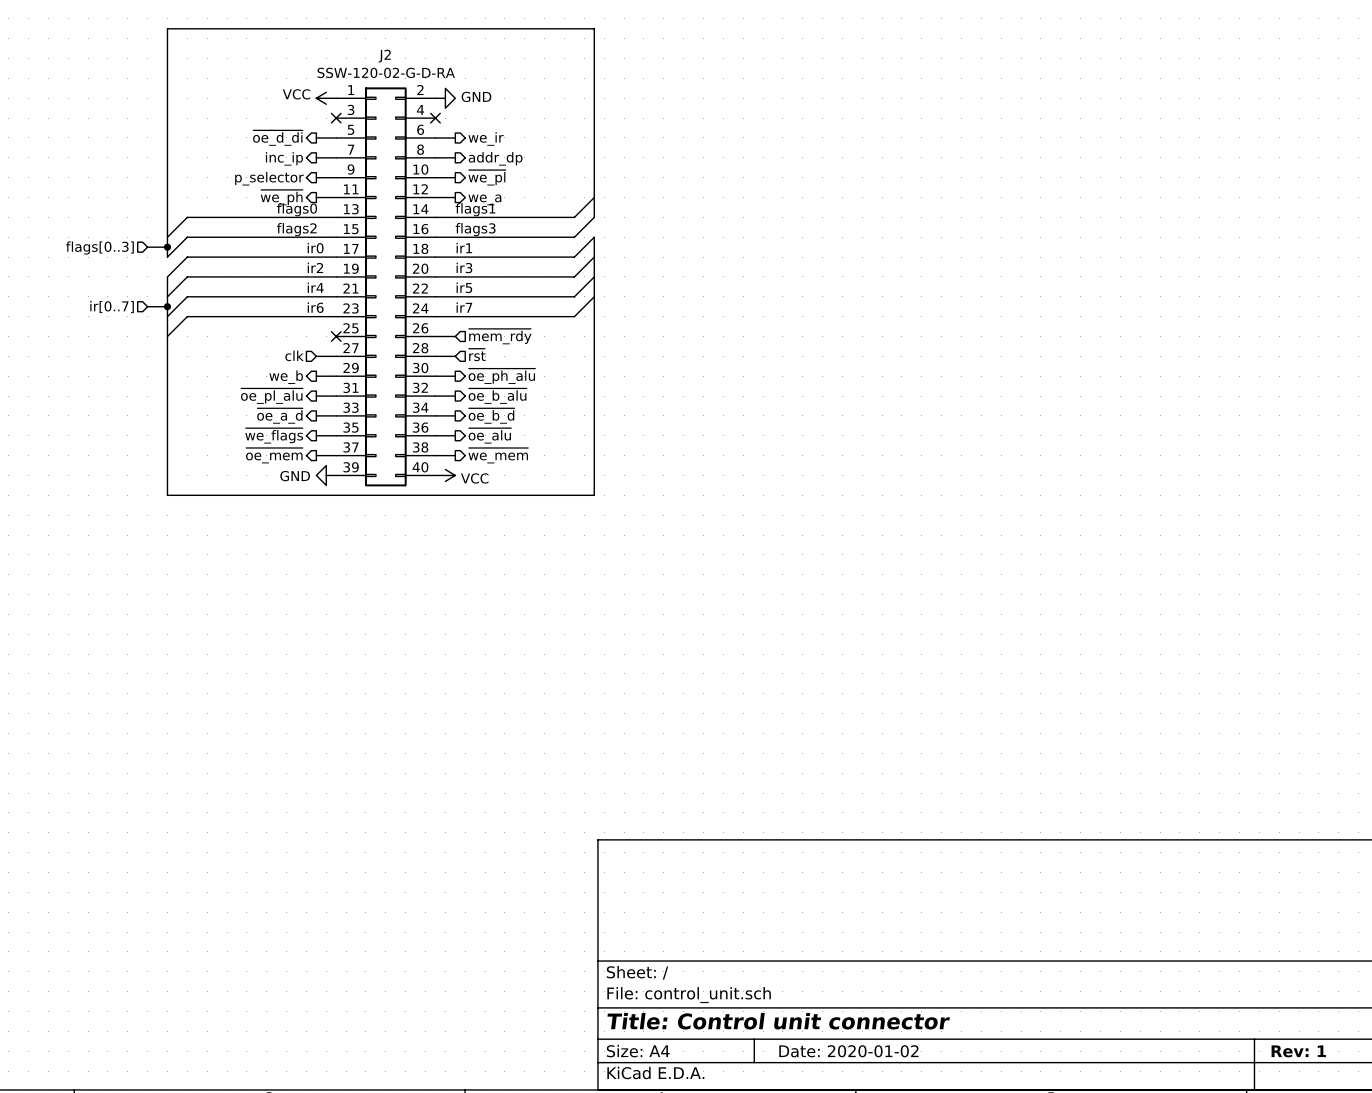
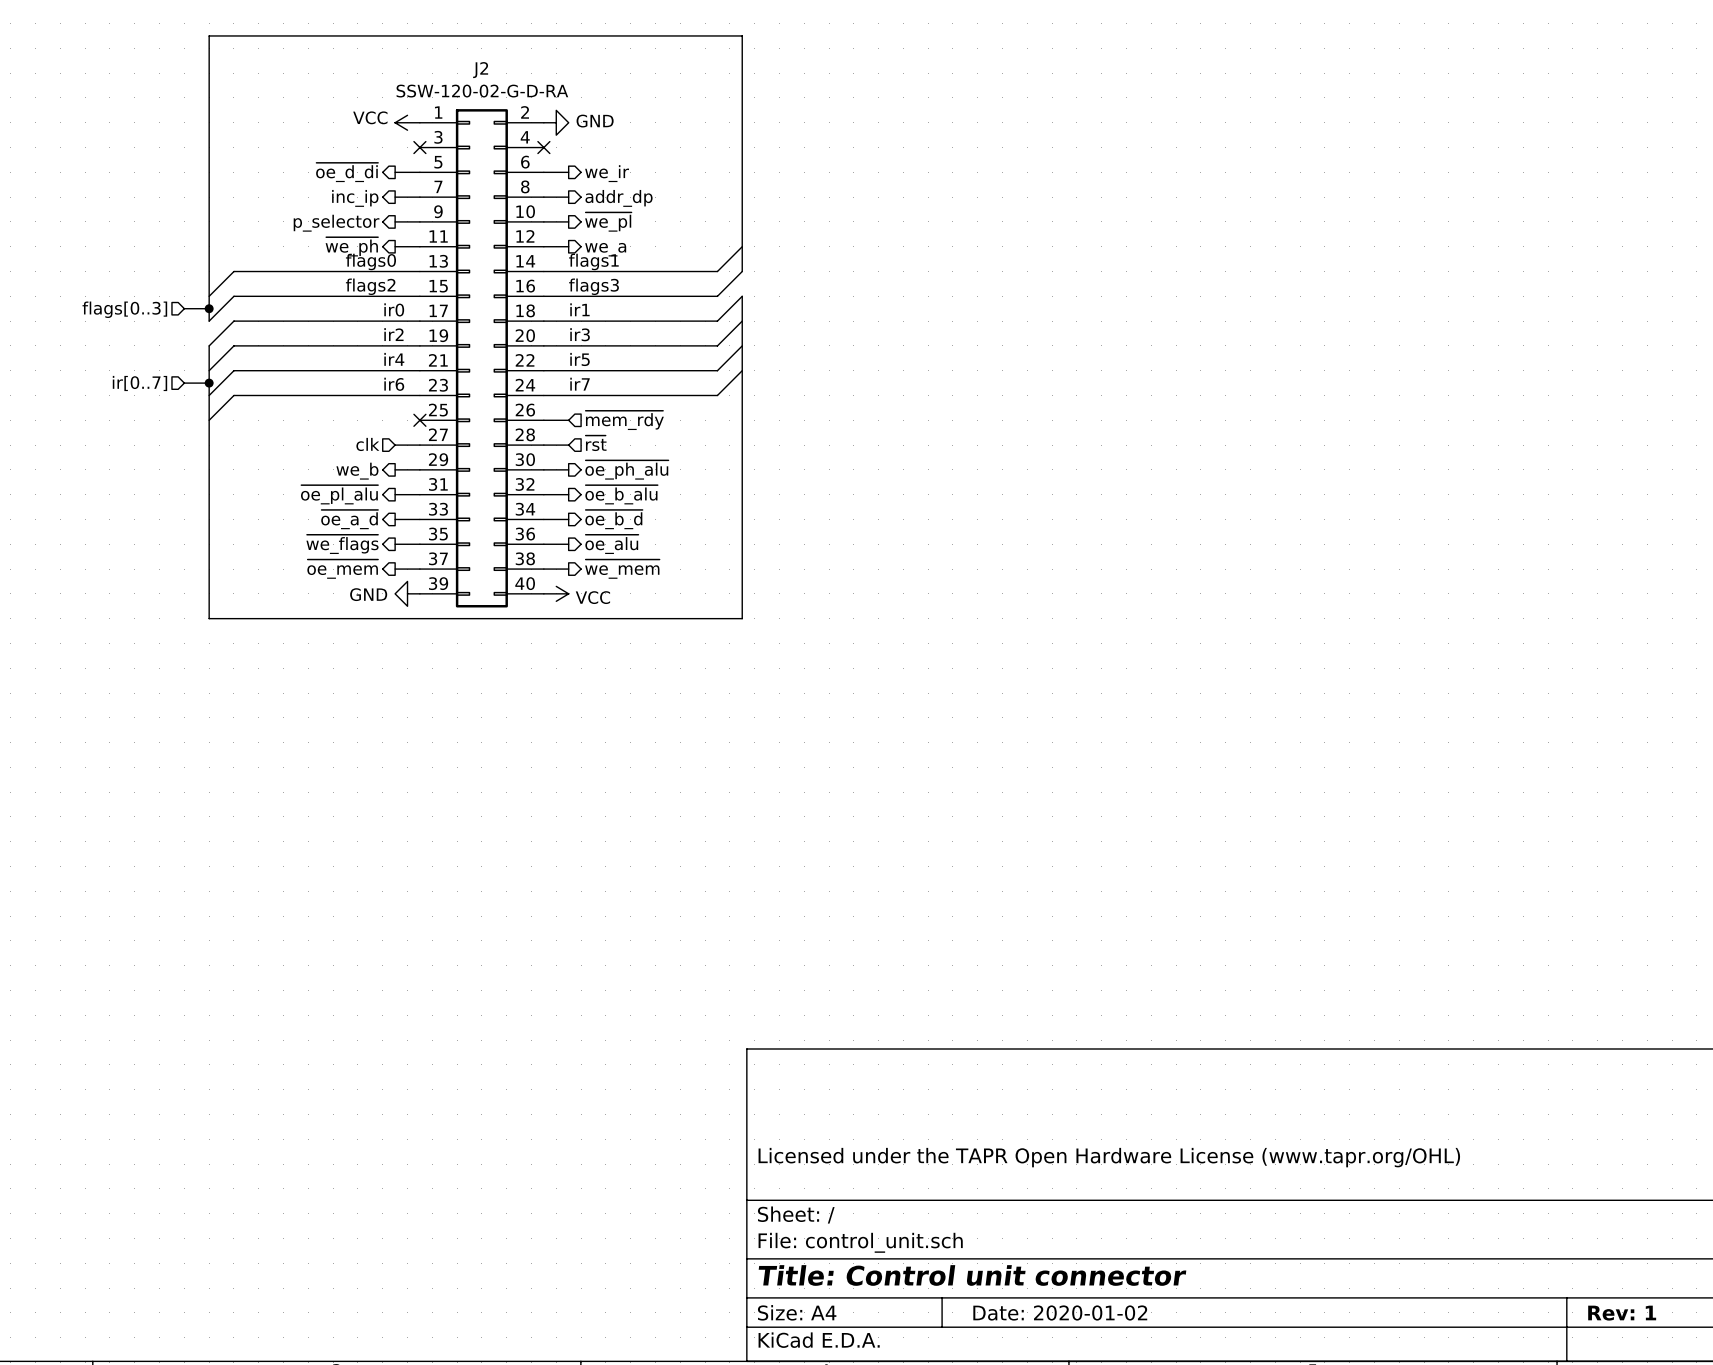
title block: none -> Licensed under the TAPR Open Hardware License (www.tapr.org/OHL) (1109, 1157)

